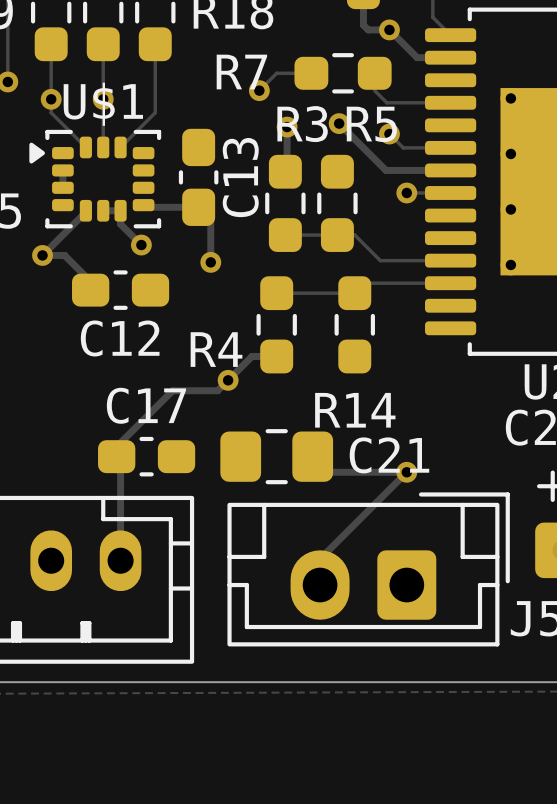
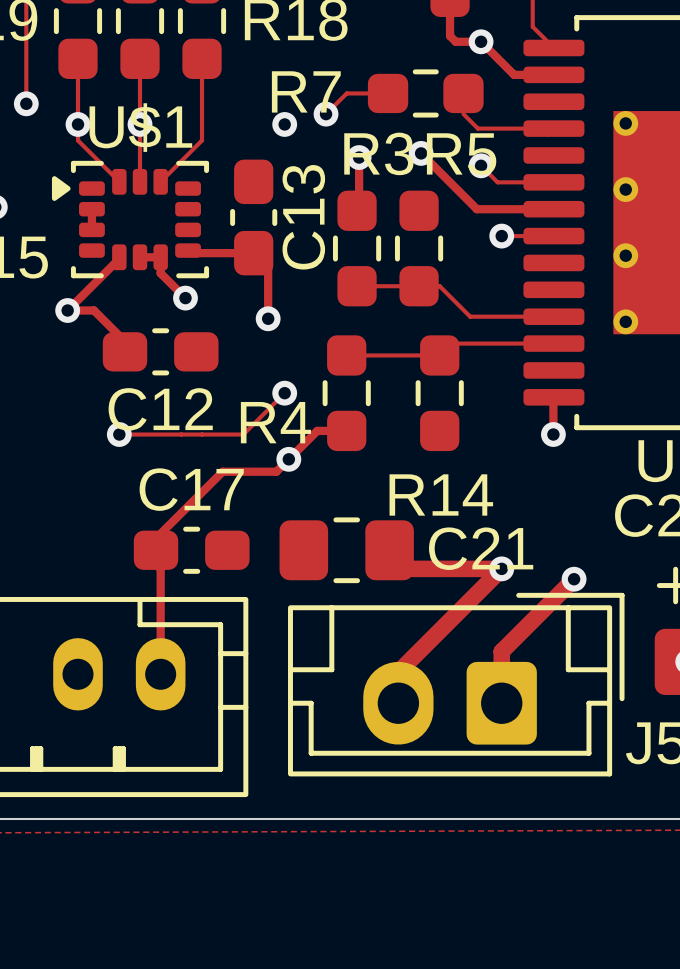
via: none -> (284, 124)
track: none -> (284, 393) (243, 434) (119, 434)
via: none -> (284, 393)
track: none -> (553, 397) (553, 434)
via: none -> (119, 434)
via: none -> (553, 434)
track width: thin (312, 472) (406, 472) (320, 559) -> thick (389, 568) (501, 568) (398, 672)
track: none -> (574, 579) (501, 651) (501, 703)
via: none -> (574, 579)

